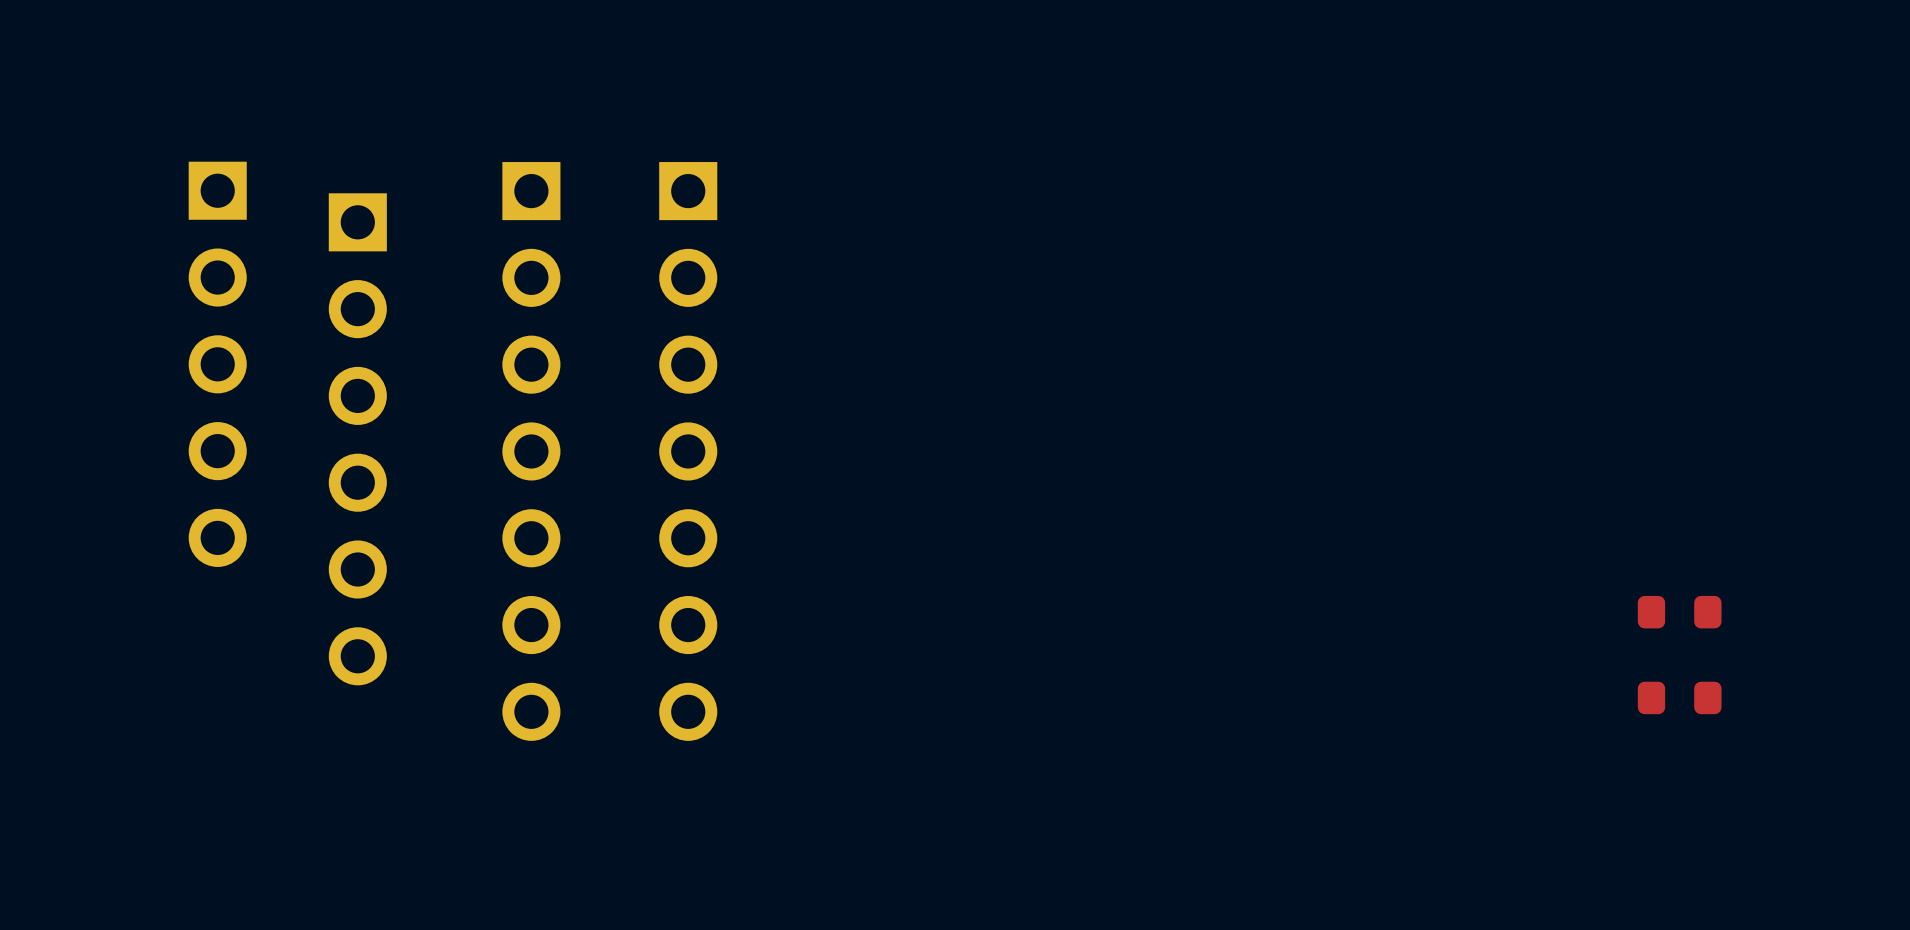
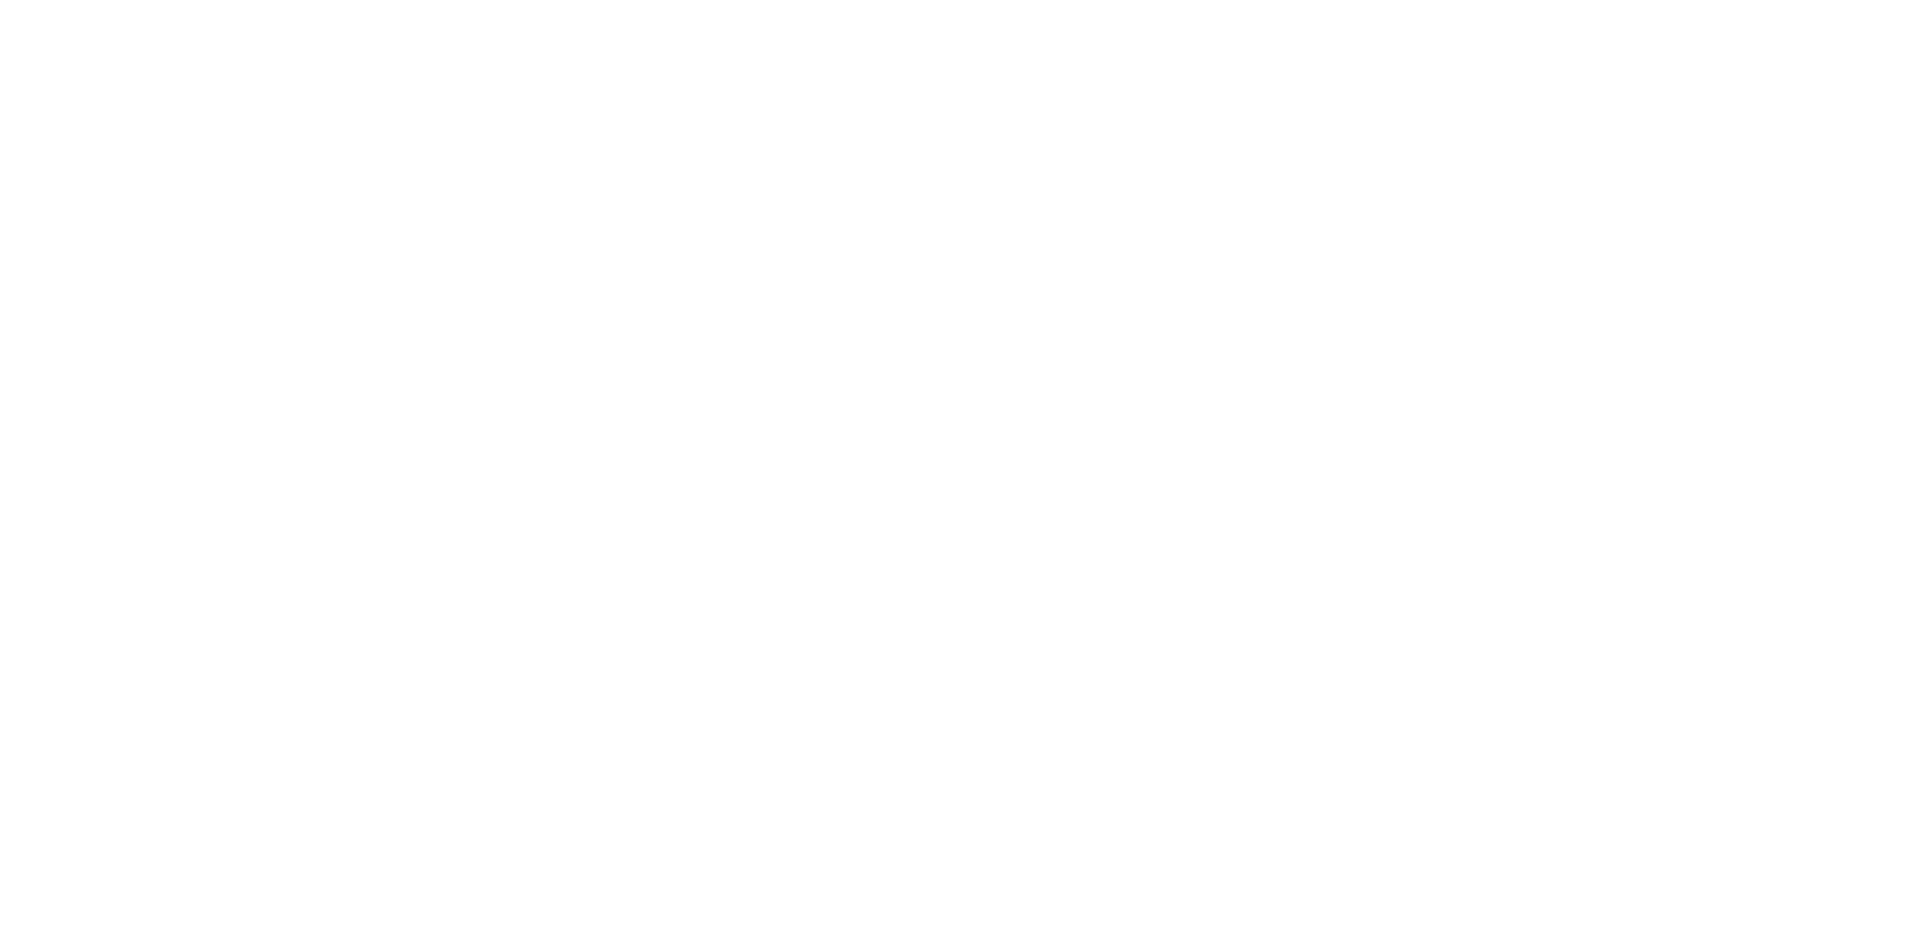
part: (217, 364) -> none
part: (357, 439) -> none
part: (531, 451) -> none
part: (688, 451) -> none
part: (1679, 612) -> none
part: (1679, 697) -> none

